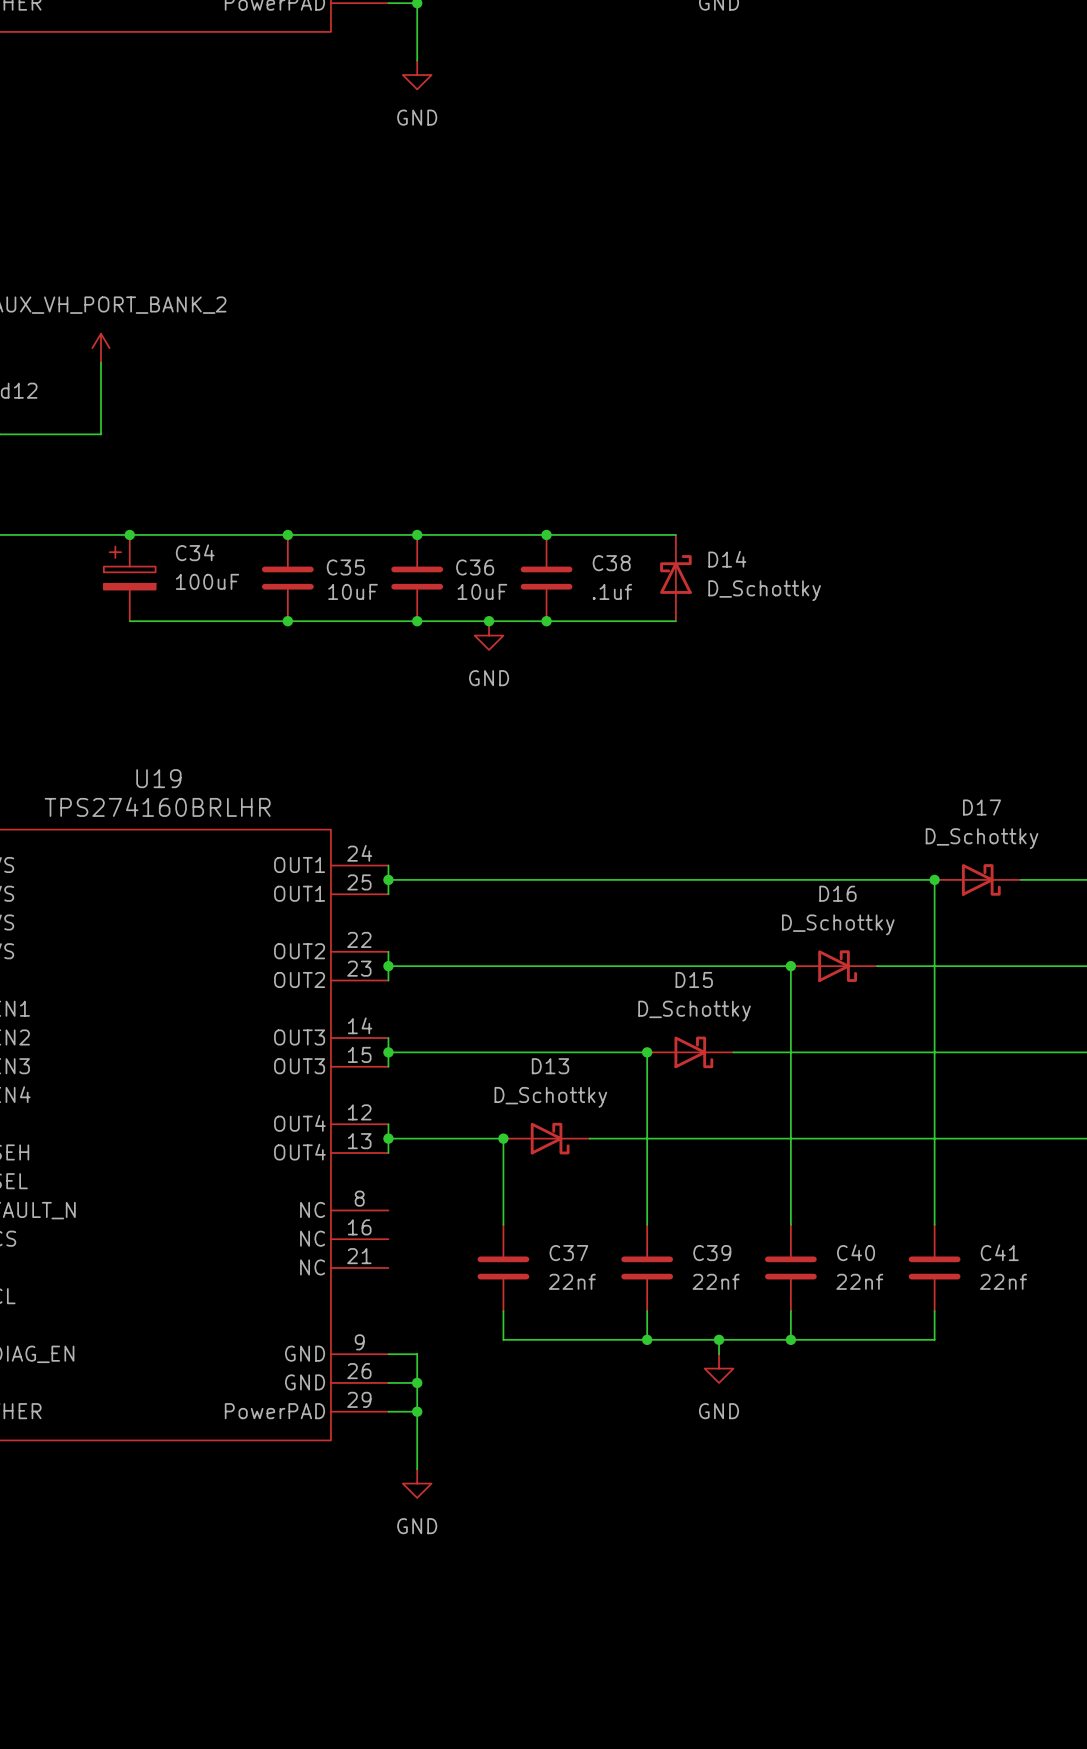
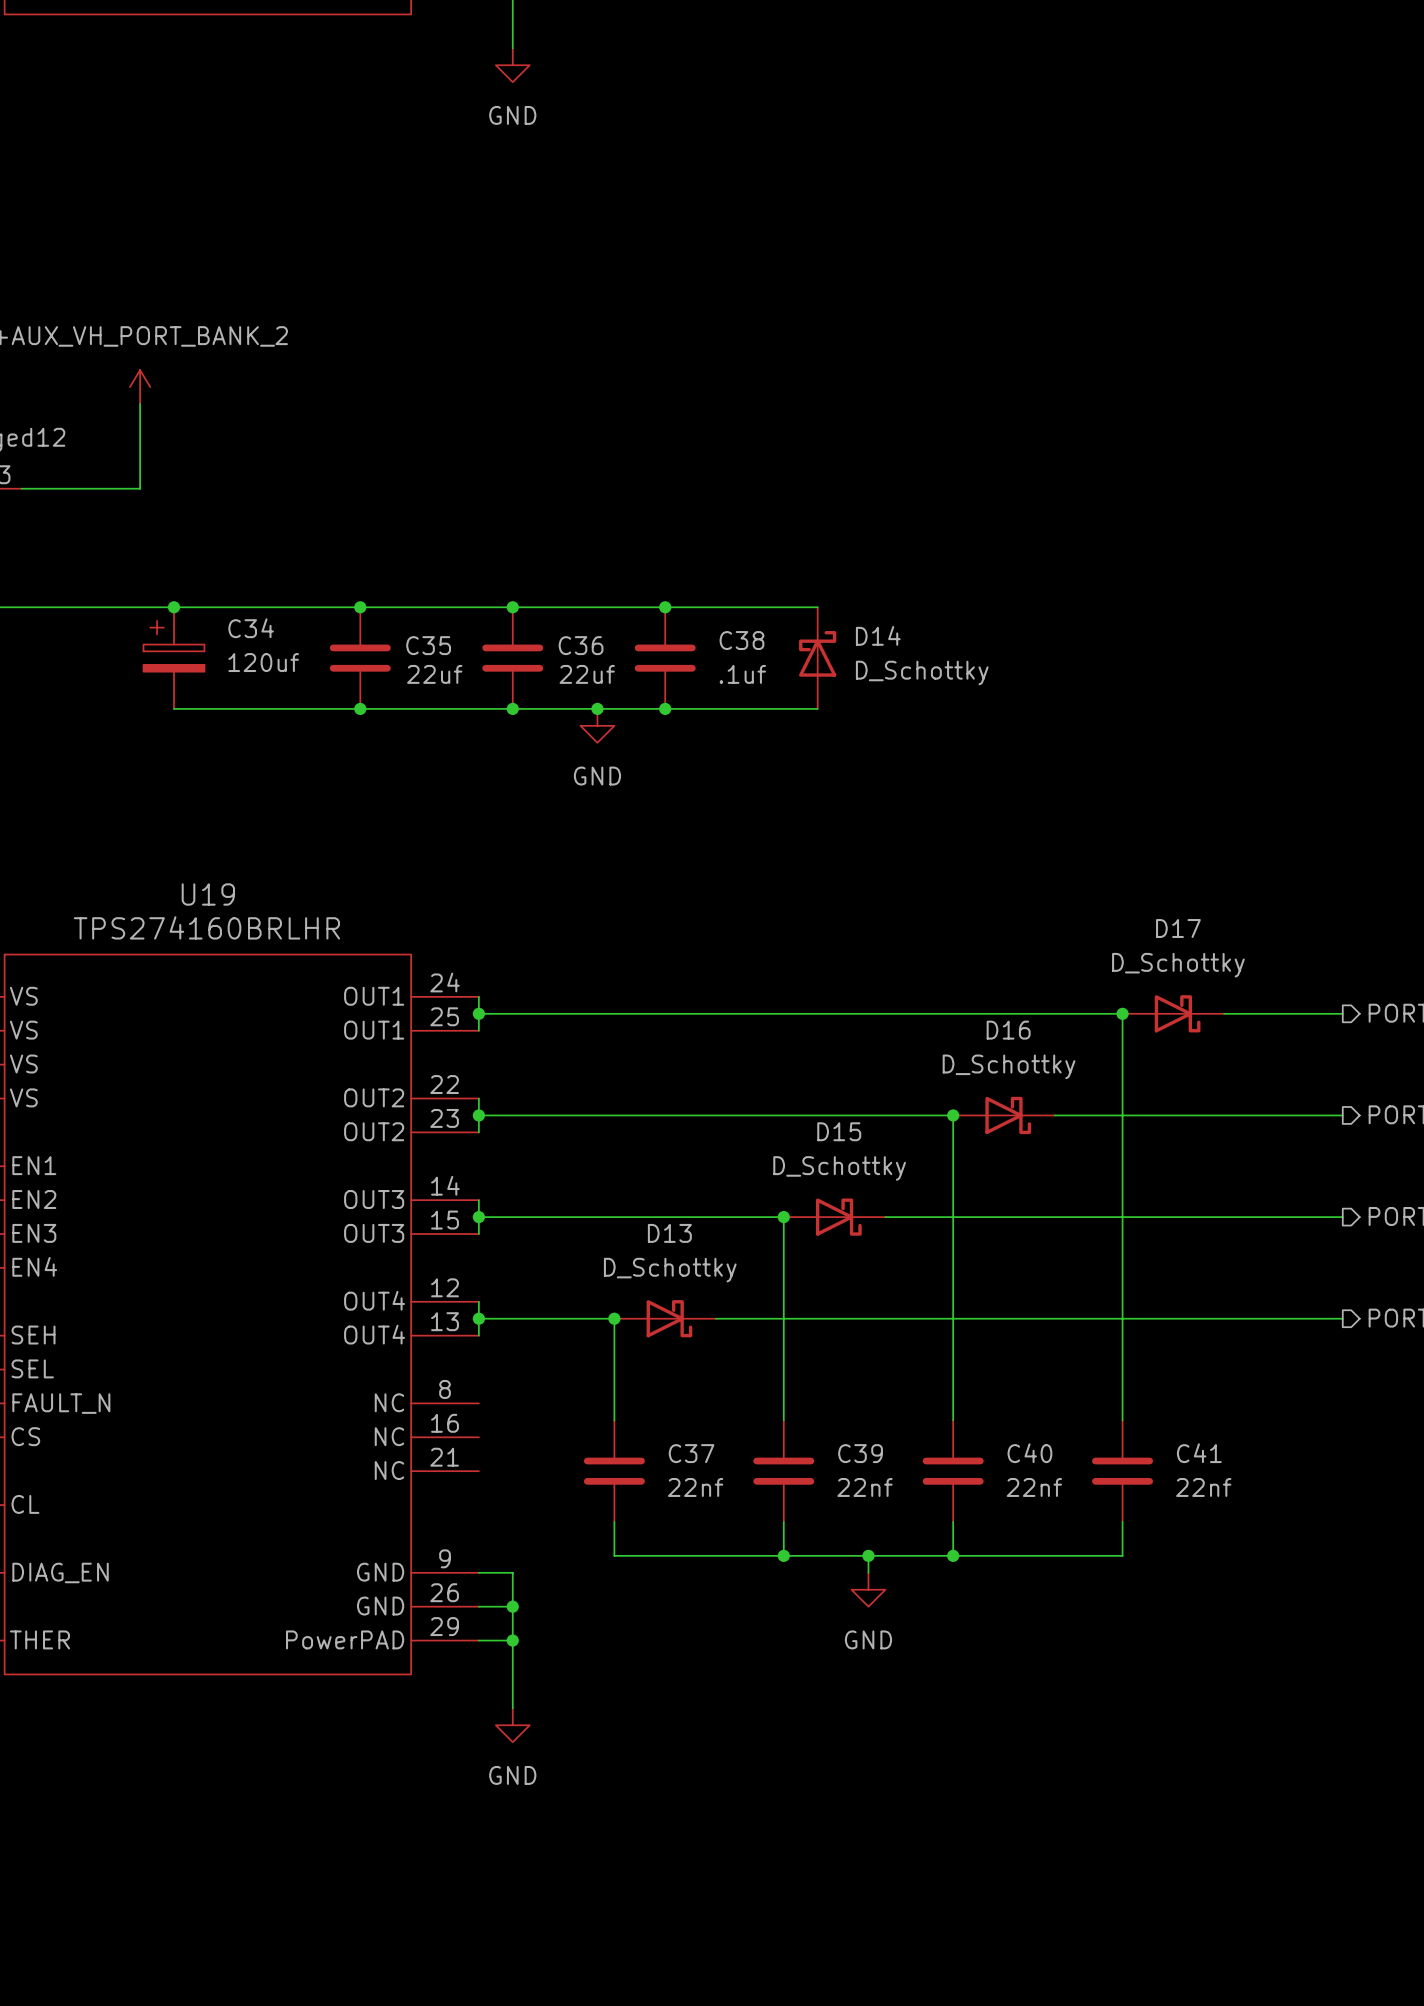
C34 value: 100uF (207, 581) -> 120uf (263, 662)
C35 value: 10uF (353, 591) -> 22uf (434, 674)
C36 value: 10uF (482, 591) -> 22uf (587, 674)

